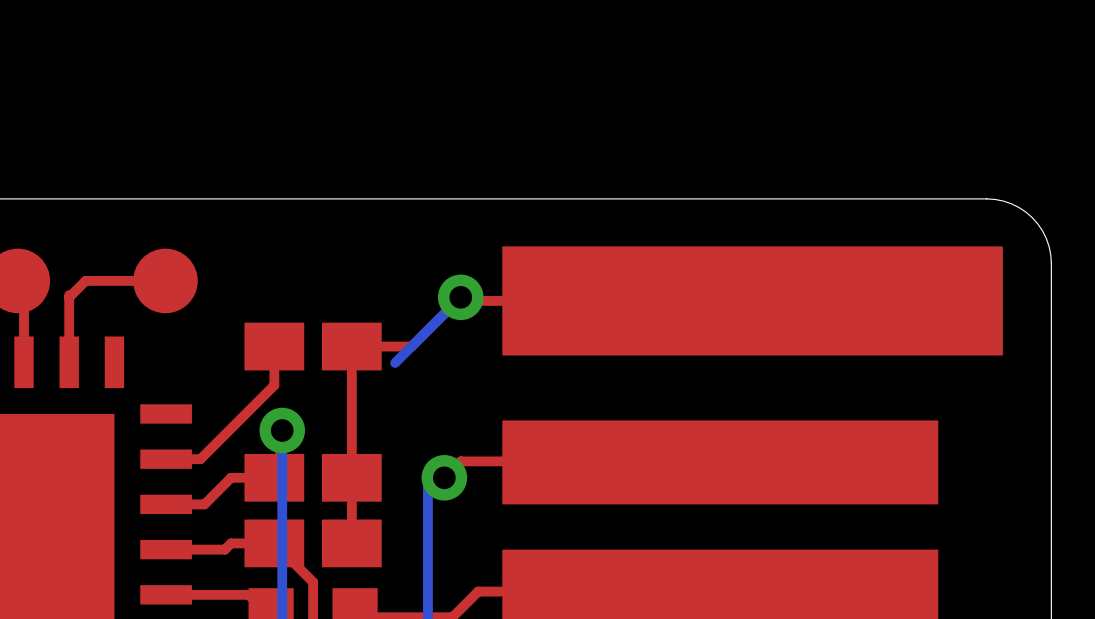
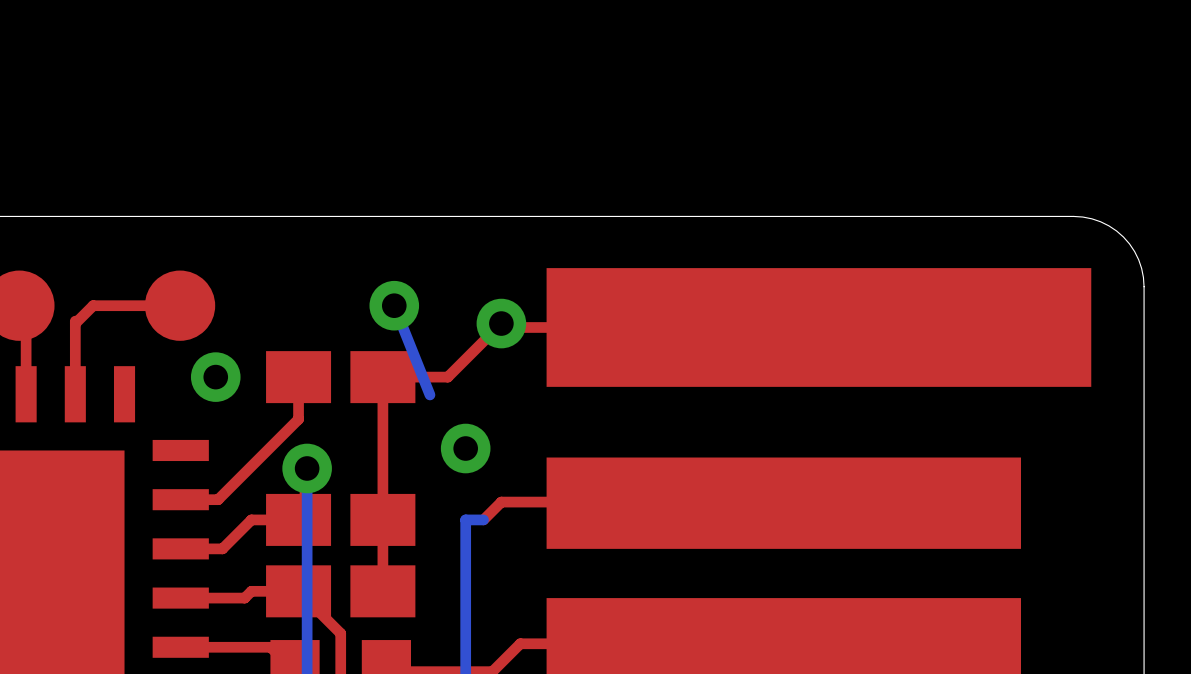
via: none -> (394, 305)
bottom track: (460, 297) (395, 362) -> (394, 305) (429, 394)
via: none -> (215, 377)
via position: (444, 477) -> (465, 448)

